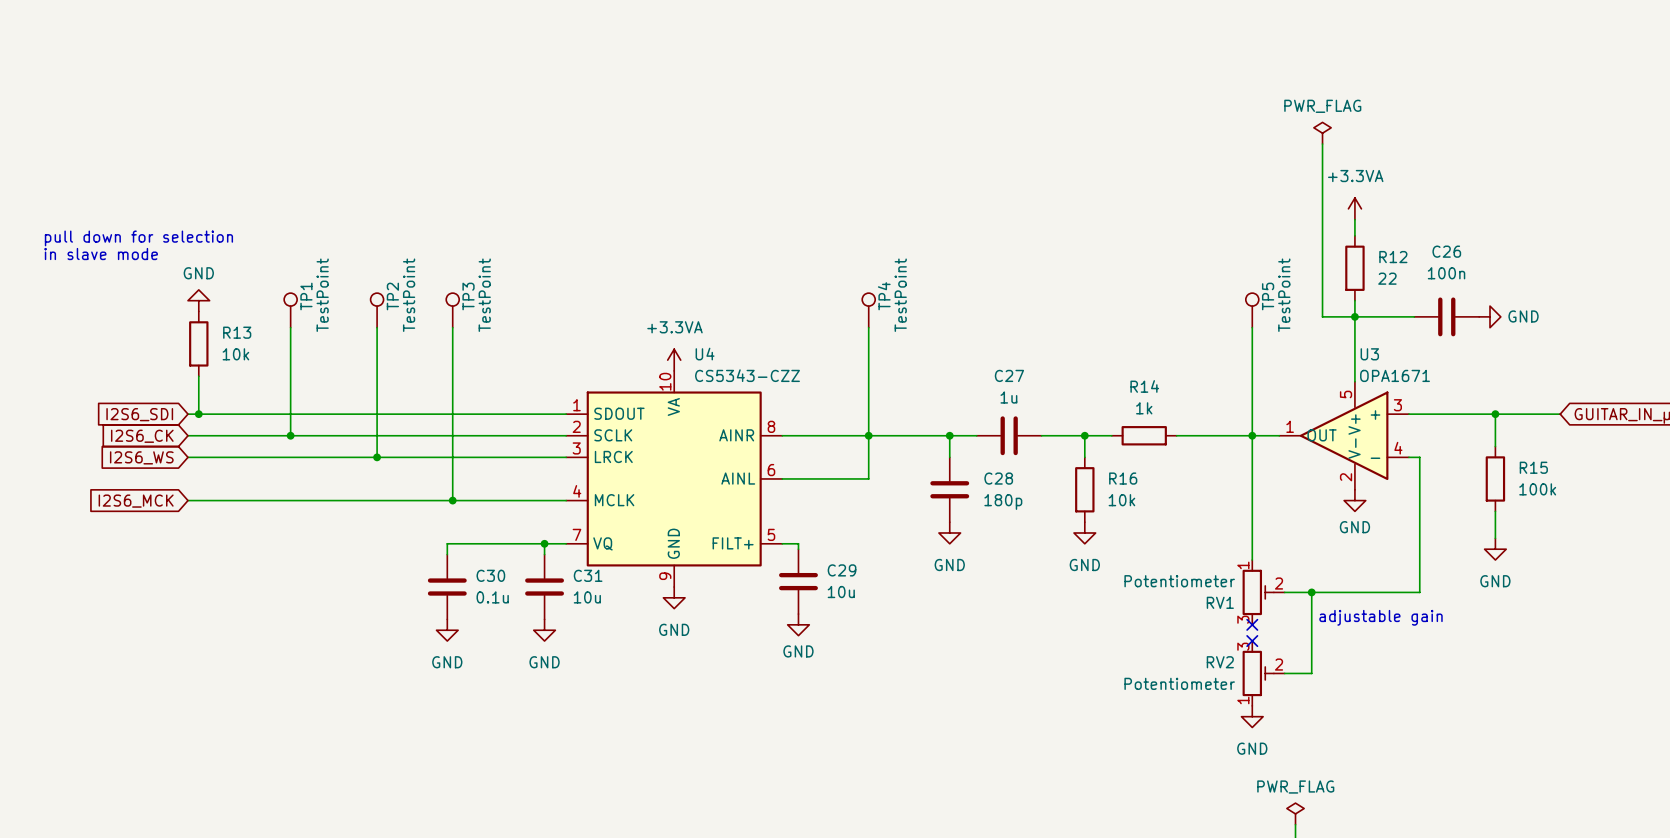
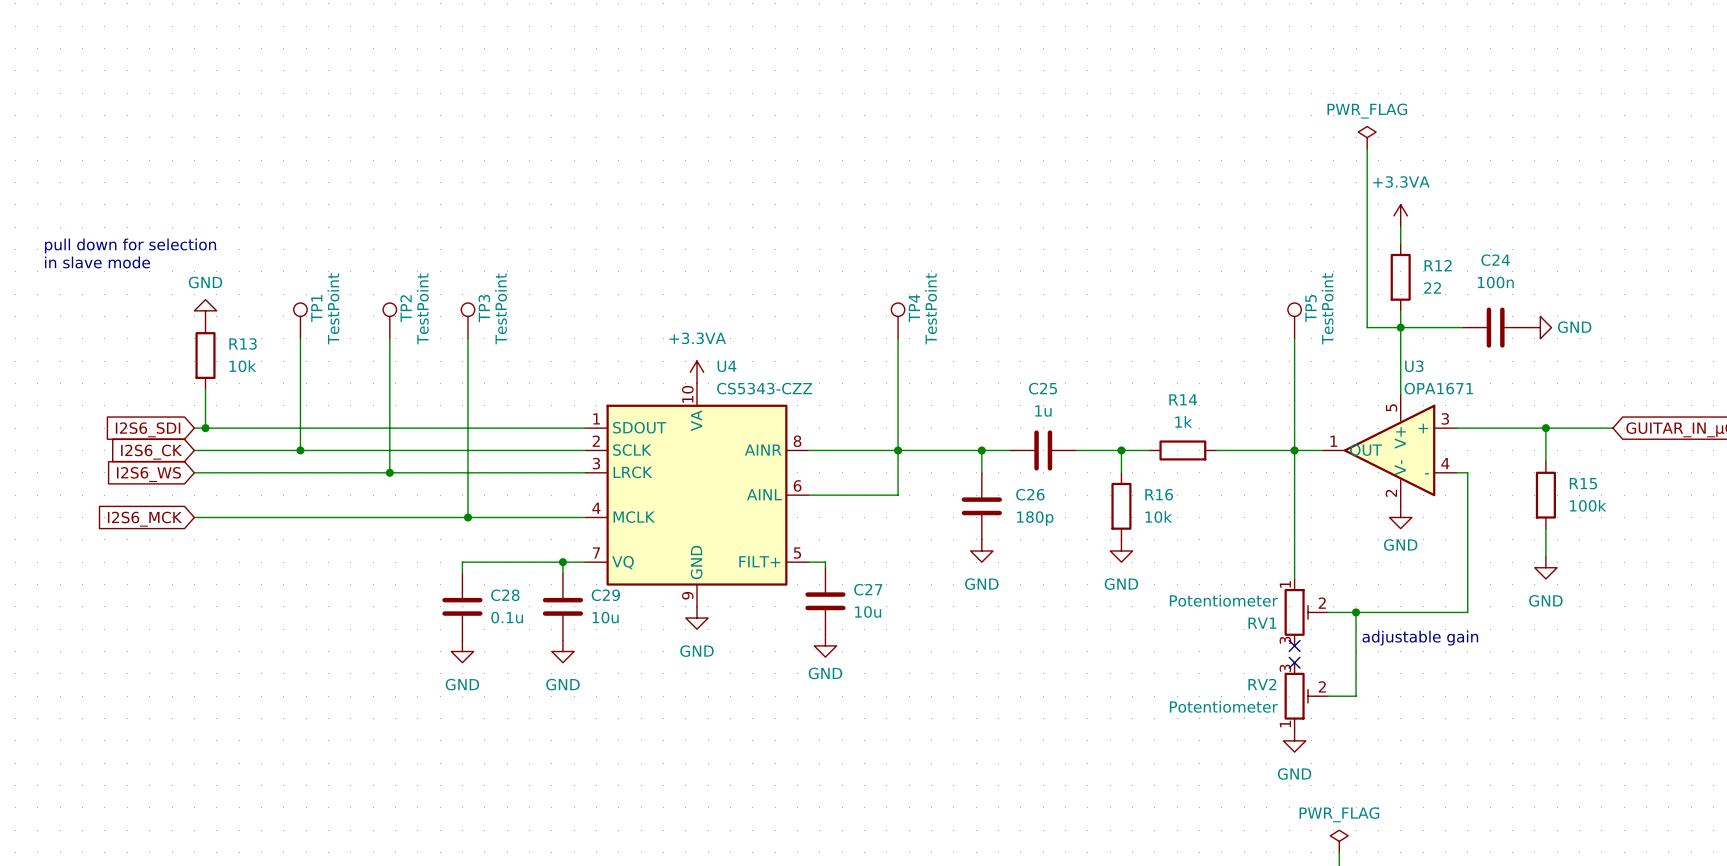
C26 name: C26 (1446, 251) -> C24 (1495, 260)
C27 name: C27 (1009, 375) -> C25 (1043, 388)
C28 name: C28 (998, 478) -> C26 (1030, 494)
C29 name: C29 (842, 570) -> C27 (868, 589)
C30 name: C30 (490, 575) -> C28 (505, 595)
C31 name: C31 (588, 575) -> C29 (605, 595)

